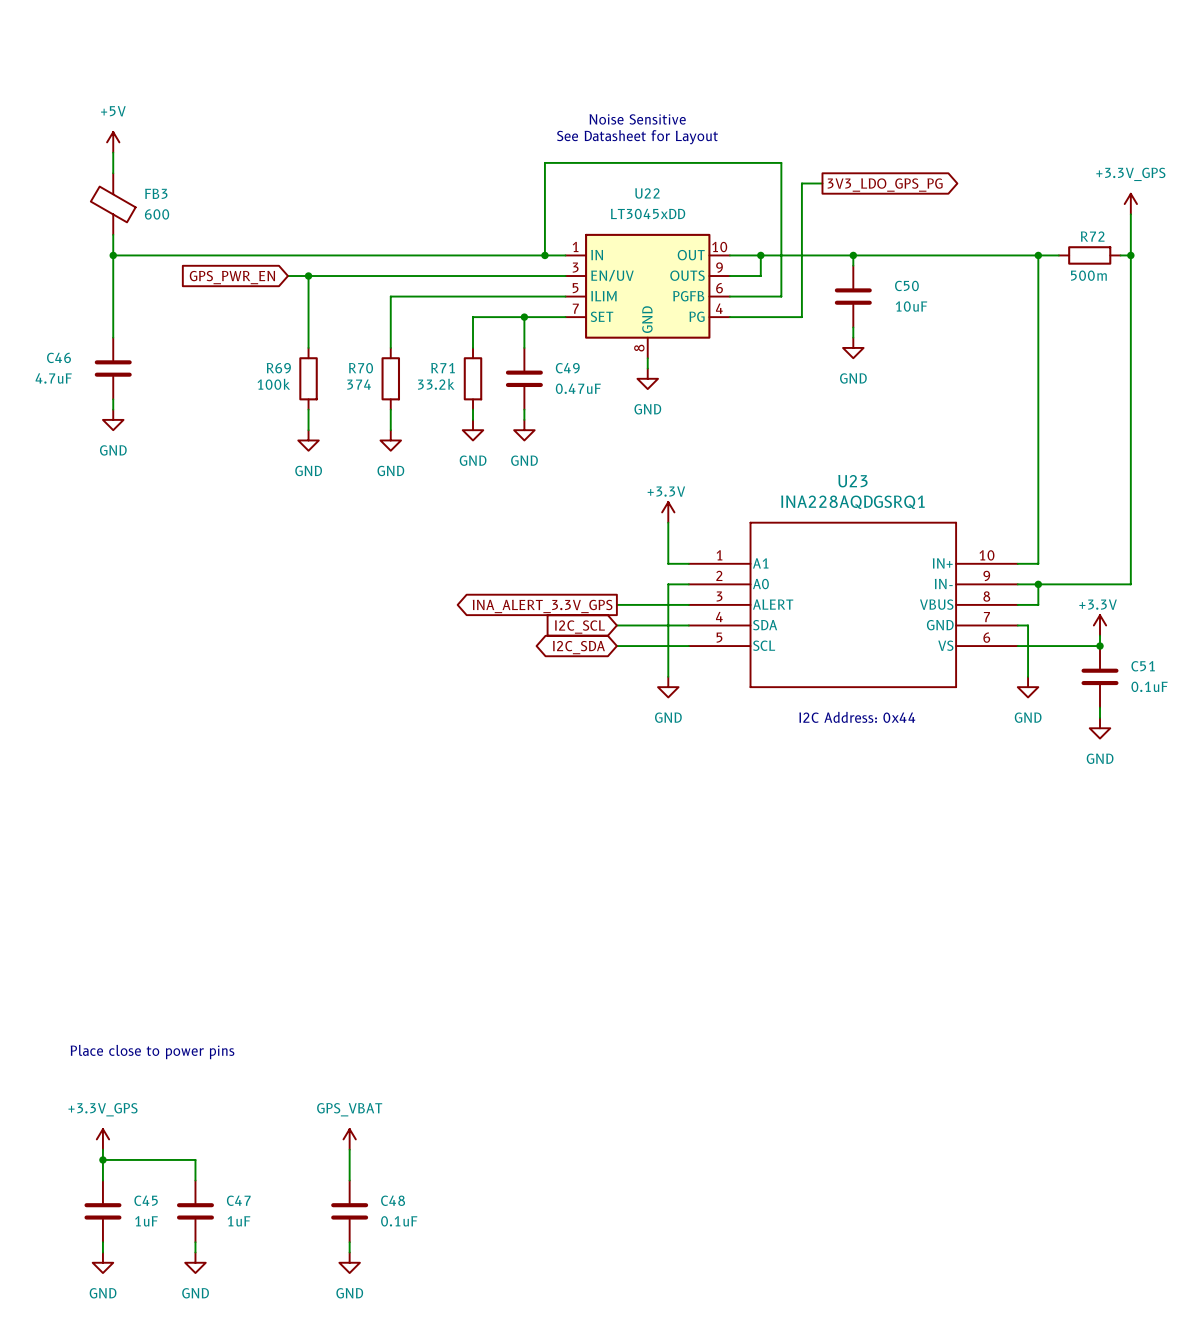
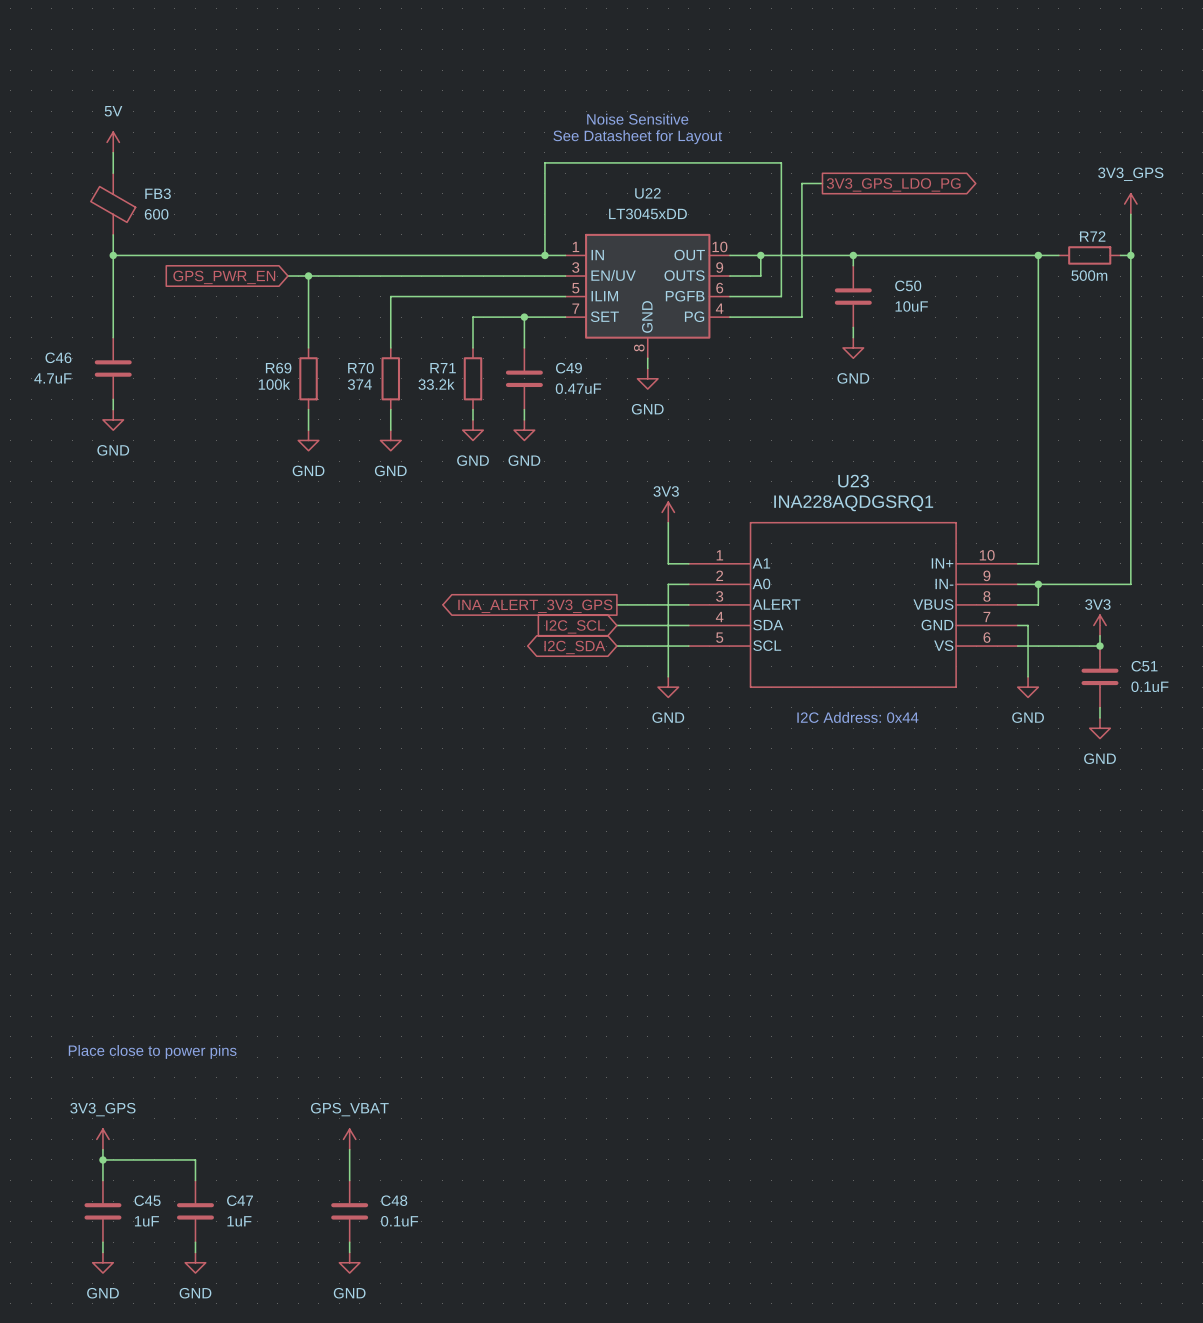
power symbol: +5V (113, 142) -> 5V (113, 142)
global label: 3V3_LDO_GPS_PG (885, 185) -> 3V3_GPS_LDO_PG (893, 184)
power symbol: +3.3V_GPS (1130, 204) -> 3V3_GPS (1130, 204)
power symbol: +3.3V (668, 512) -> 3V3 (668, 512)
global label: INA_ALERT_3.3V_GPS (542, 606) -> INA_ALERT_3V3_GPS (535, 606)
power symbol: +3.3V (1100, 625) -> 3V3 (1100, 625)
power symbol: +3.3V_GPS (102, 1139) -> 3V3_GPS (102, 1139)

